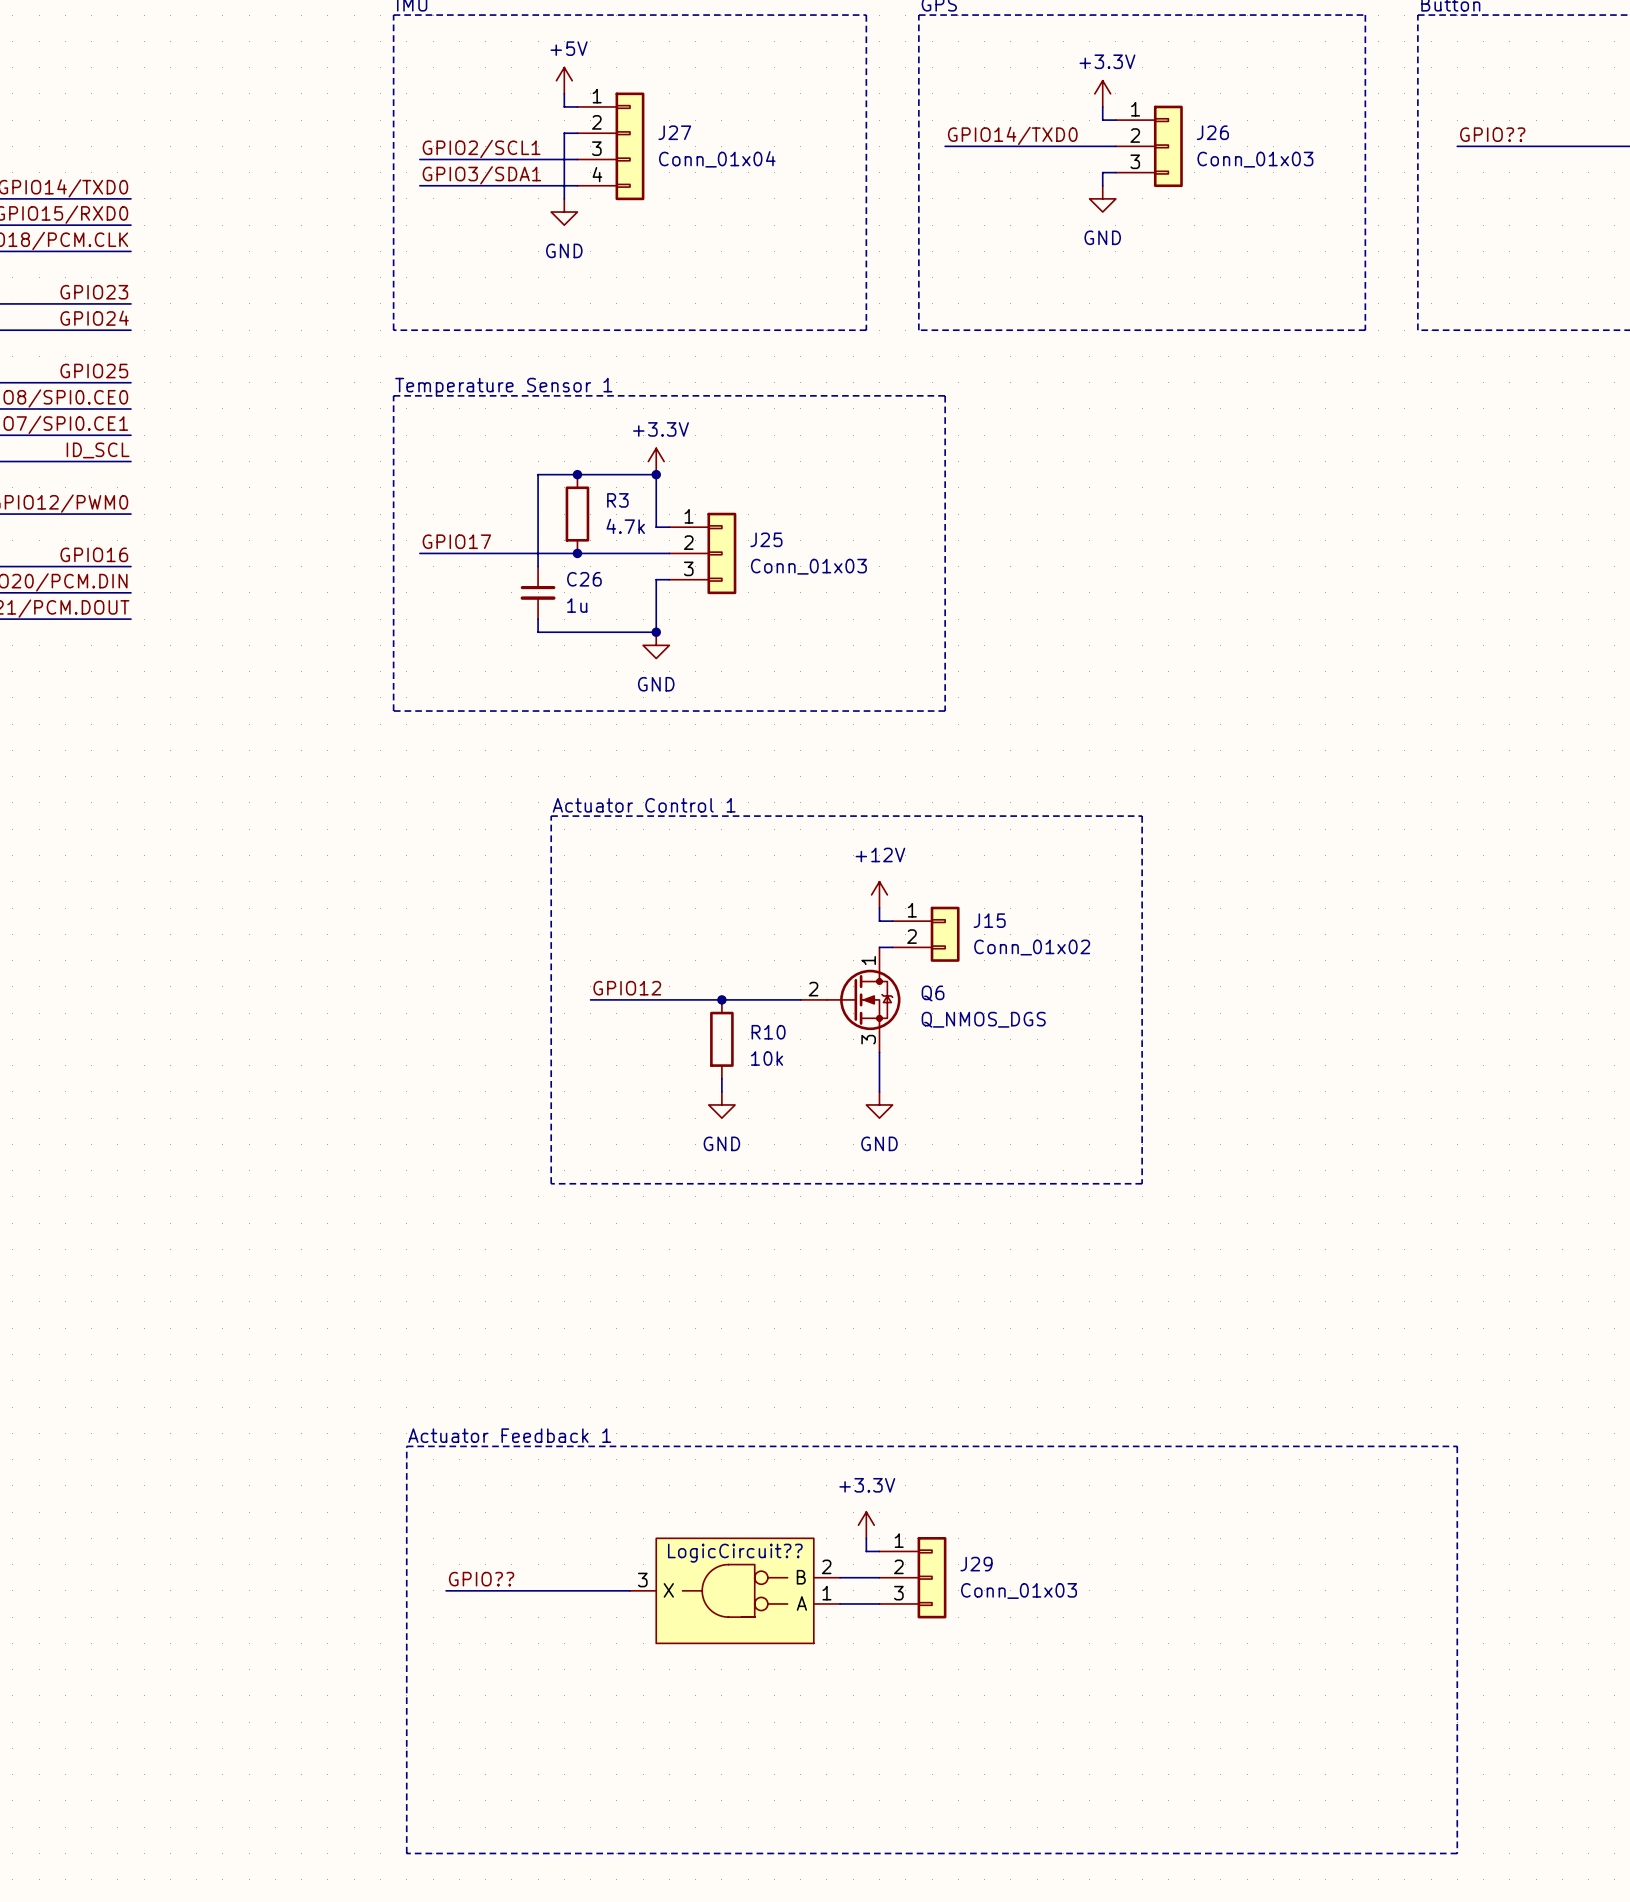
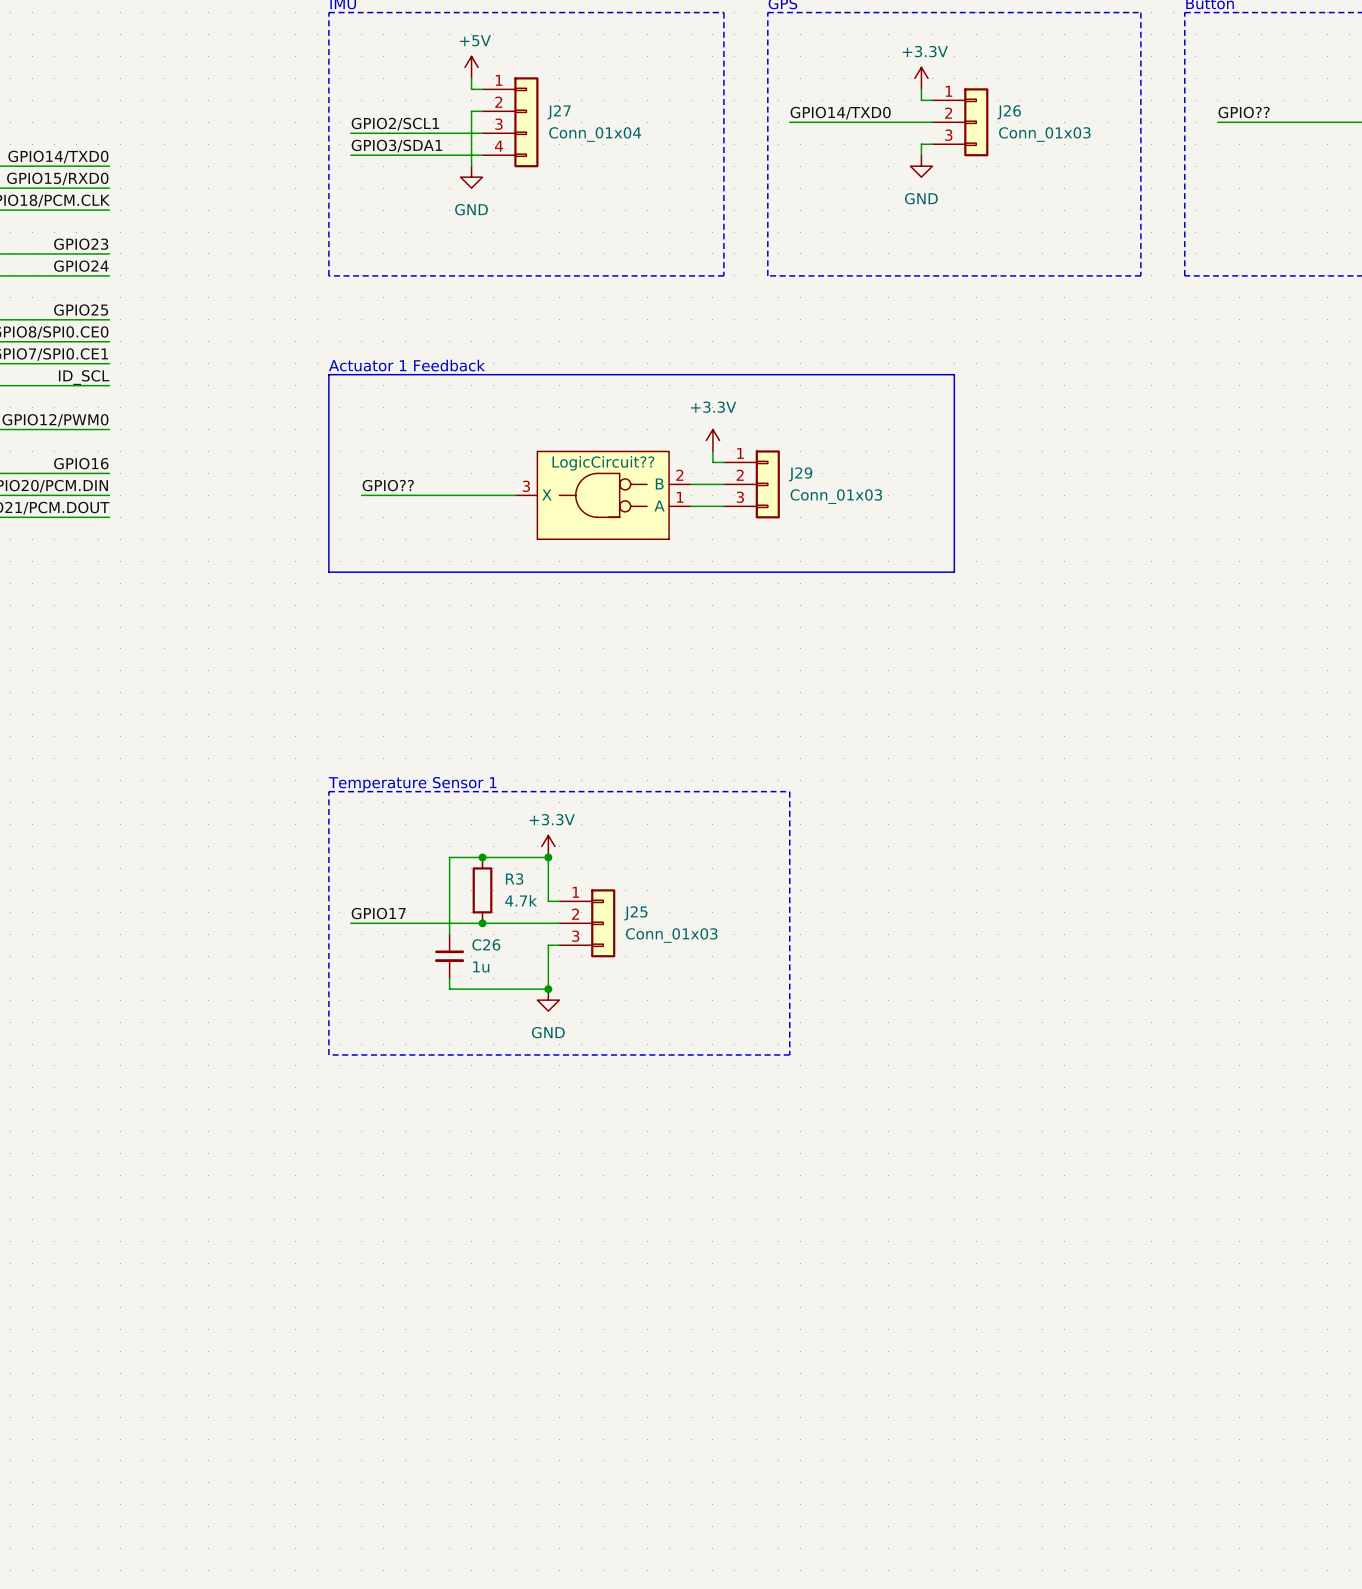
text: Temperature Sensor 1 (503, 387) -> none
line: (393, 395) (945, 395) (945, 711) (393, 711) (393, 395) -> (328, 374) (328, 572) (954, 572) (954, 374) (328, 374)
power symbol text position: +3.3V (660, 429) -> +3.3V (713, 407)
text: none -> Actuator 1 Feedback (407, 365)
power symbol position: +3.3V (656, 461) -> +3.3V (712, 440)
junction: (577, 474) -> none
junction: (656, 474) -> none
R3 position: (577, 514) -> (482, 890)
wire: (669, 527) (656, 527) (656, 474) (538, 474) (538, 566) -> none
wire: none -> (712, 451) (712, 462) (723, 462)
label: GPIO17 (456, 541) -> none
wire: (419, 553) (669, 553) -> none
junction: (577, 553) -> none
J25 position: (702, 553) -> (587, 923)
wire: (669, 579) (656, 579) (656, 632) (538, 632) (538, 619) -> none
wire: none -> (691, 484) (723, 484)
label: none -> GPIO?? (388, 485)
wire: none -> (361, 495) (515, 495)
C26 position: (538, 592) -> (449, 956)
LogicCircuit??: none -> (603, 495)
wire: none -> (691, 506) (723, 506)
junction: (656, 632) -> none
power symbol: GND (656, 645) -> none
text: Actuator Control 1 (644, 805) -> none
line: (551, 816) (1142, 816) (1142, 1183) (551, 1183) (551, 816) -> none
power symbol: +12V (879, 894) -> none
wire: (879, 908) (879, 921) (892, 921) -> none
J15: Conn_01x02 (926, 934) -> none
text: none -> Temperature Sensor 1 (412, 784)
line: none -> (328, 791) (789, 791) (789, 1054) (328, 1054) (328, 791)
label: GPIO12 (627, 988) -> none
wire: (590, 999) (800, 999) -> none
junction: (721, 999) -> none
Q6: Q_NMOS_DGS (850, 999) -> none
power symbol: none -> +3.3V (548, 846)
junction: none -> (482, 857)
junction: none -> (548, 857)
R10: 10k (721, 1039) -> none
wire: (879, 1052) (879, 1091) -> none
wire: none -> (559, 901) (548, 901) (548, 857) (449, 857) (449, 934)
label: none -> GPIO17 (378, 913)
wire: none -> (350, 923) (559, 923)
junction: none -> (482, 923)
power symbol position: GND (721, 1104) -> GND (548, 1000)
power symbol: GND (879, 1104) -> none
wire: none -> (559, 945) (548, 945) (548, 989) (449, 989) (449, 978)
junction: none -> (548, 989)
text: Actuator Feedback 1 (509, 1435) -> none
line: (406, 1446) (1457, 1446) (1457, 1853) (406, 1853) (406, 1446) -> none
power symbol: +3.3V (866, 1525) -> none
wire: (866, 1538) (866, 1551) (879, 1551) -> none
wire: (840, 1577) (879, 1577) -> none
J29 position: (912, 1577) -> (751, 484)
label: GPIO?? (481, 1579) -> none
wire: (446, 1590) (629, 1590) -> none
LogicCircuit??: (735, 1590) -> none
wire: (840, 1603) (879, 1603) -> none

